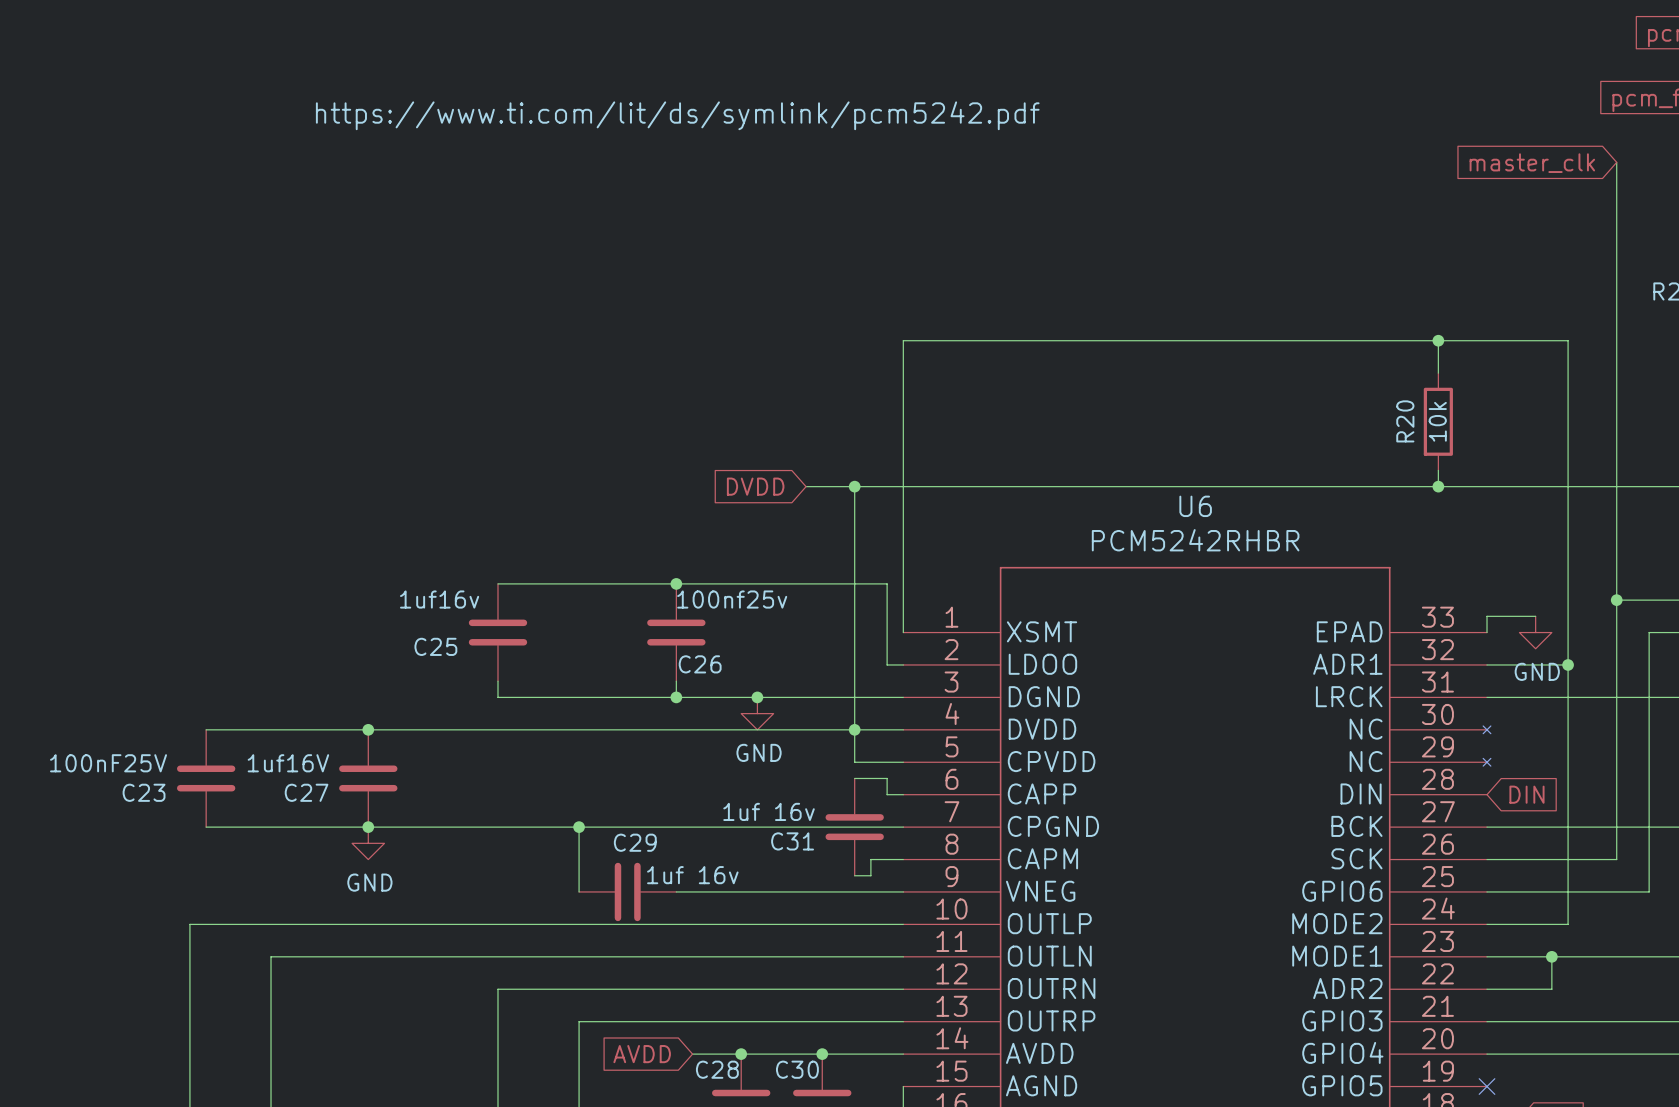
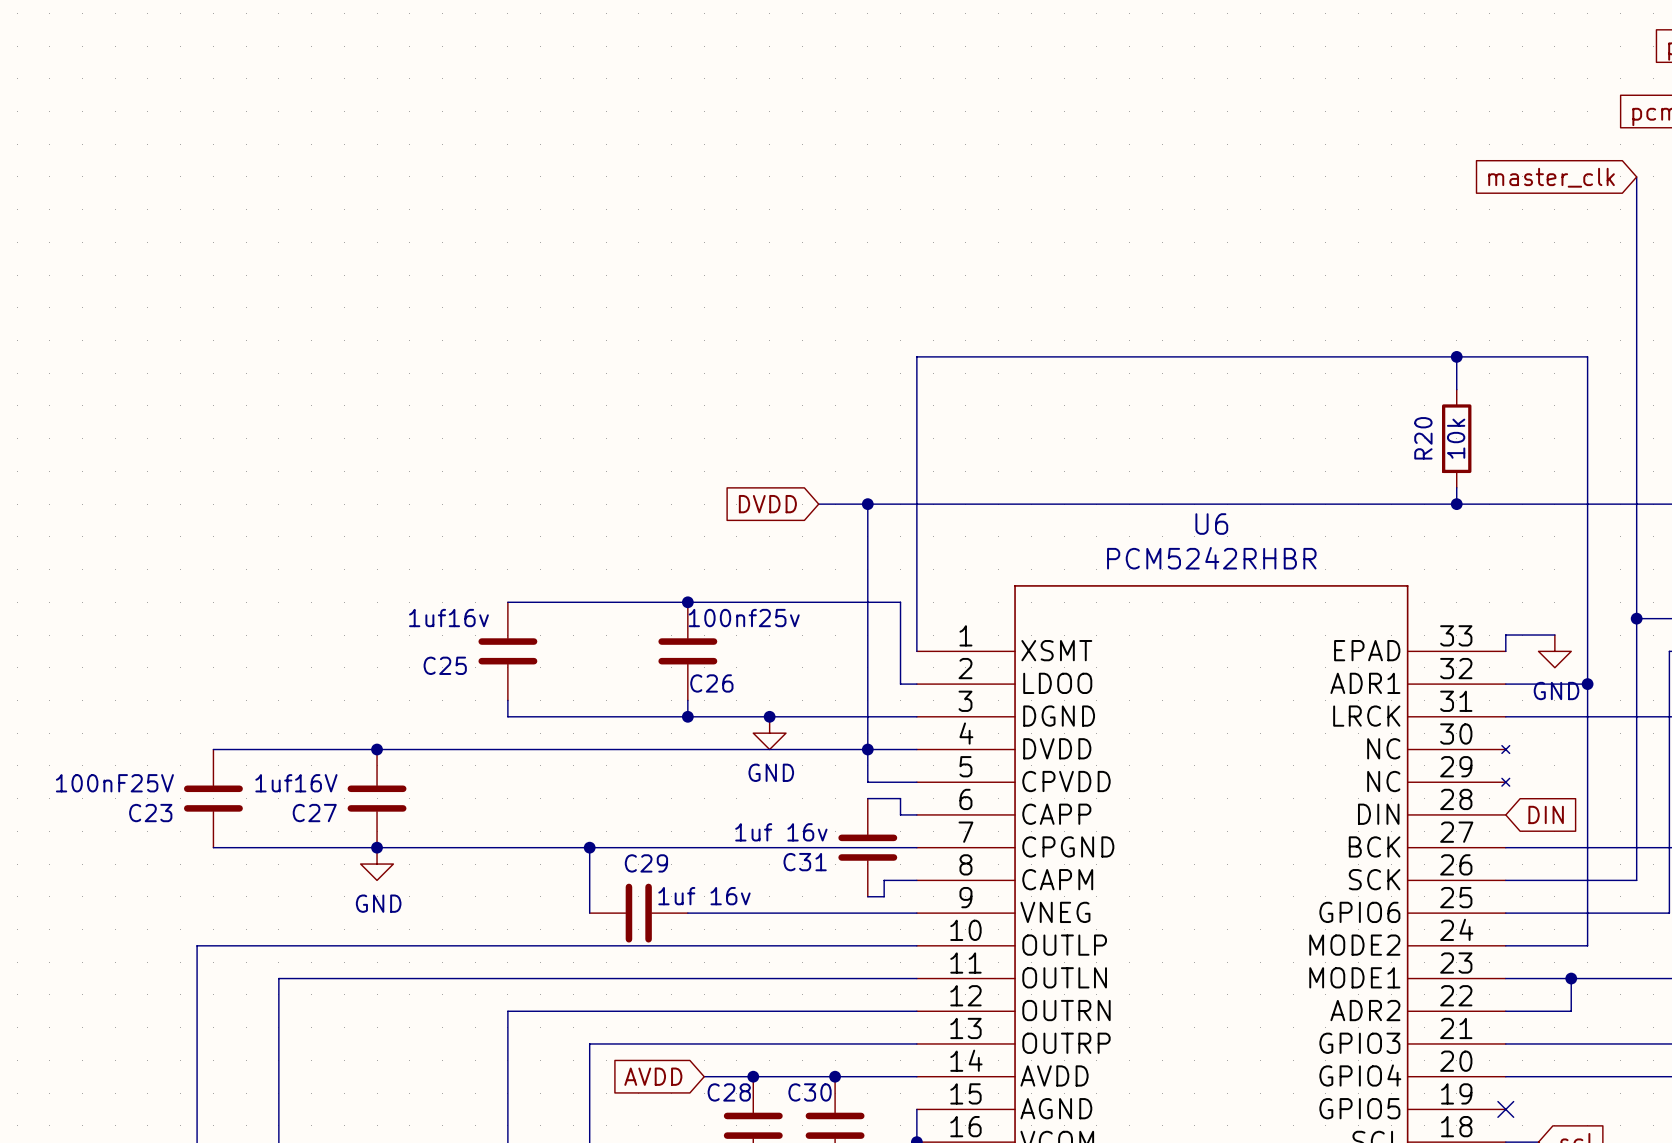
U6 text: https://www.ti.com/lit/ds/symlink/pcm5242.pdf (677, 115) -> none

